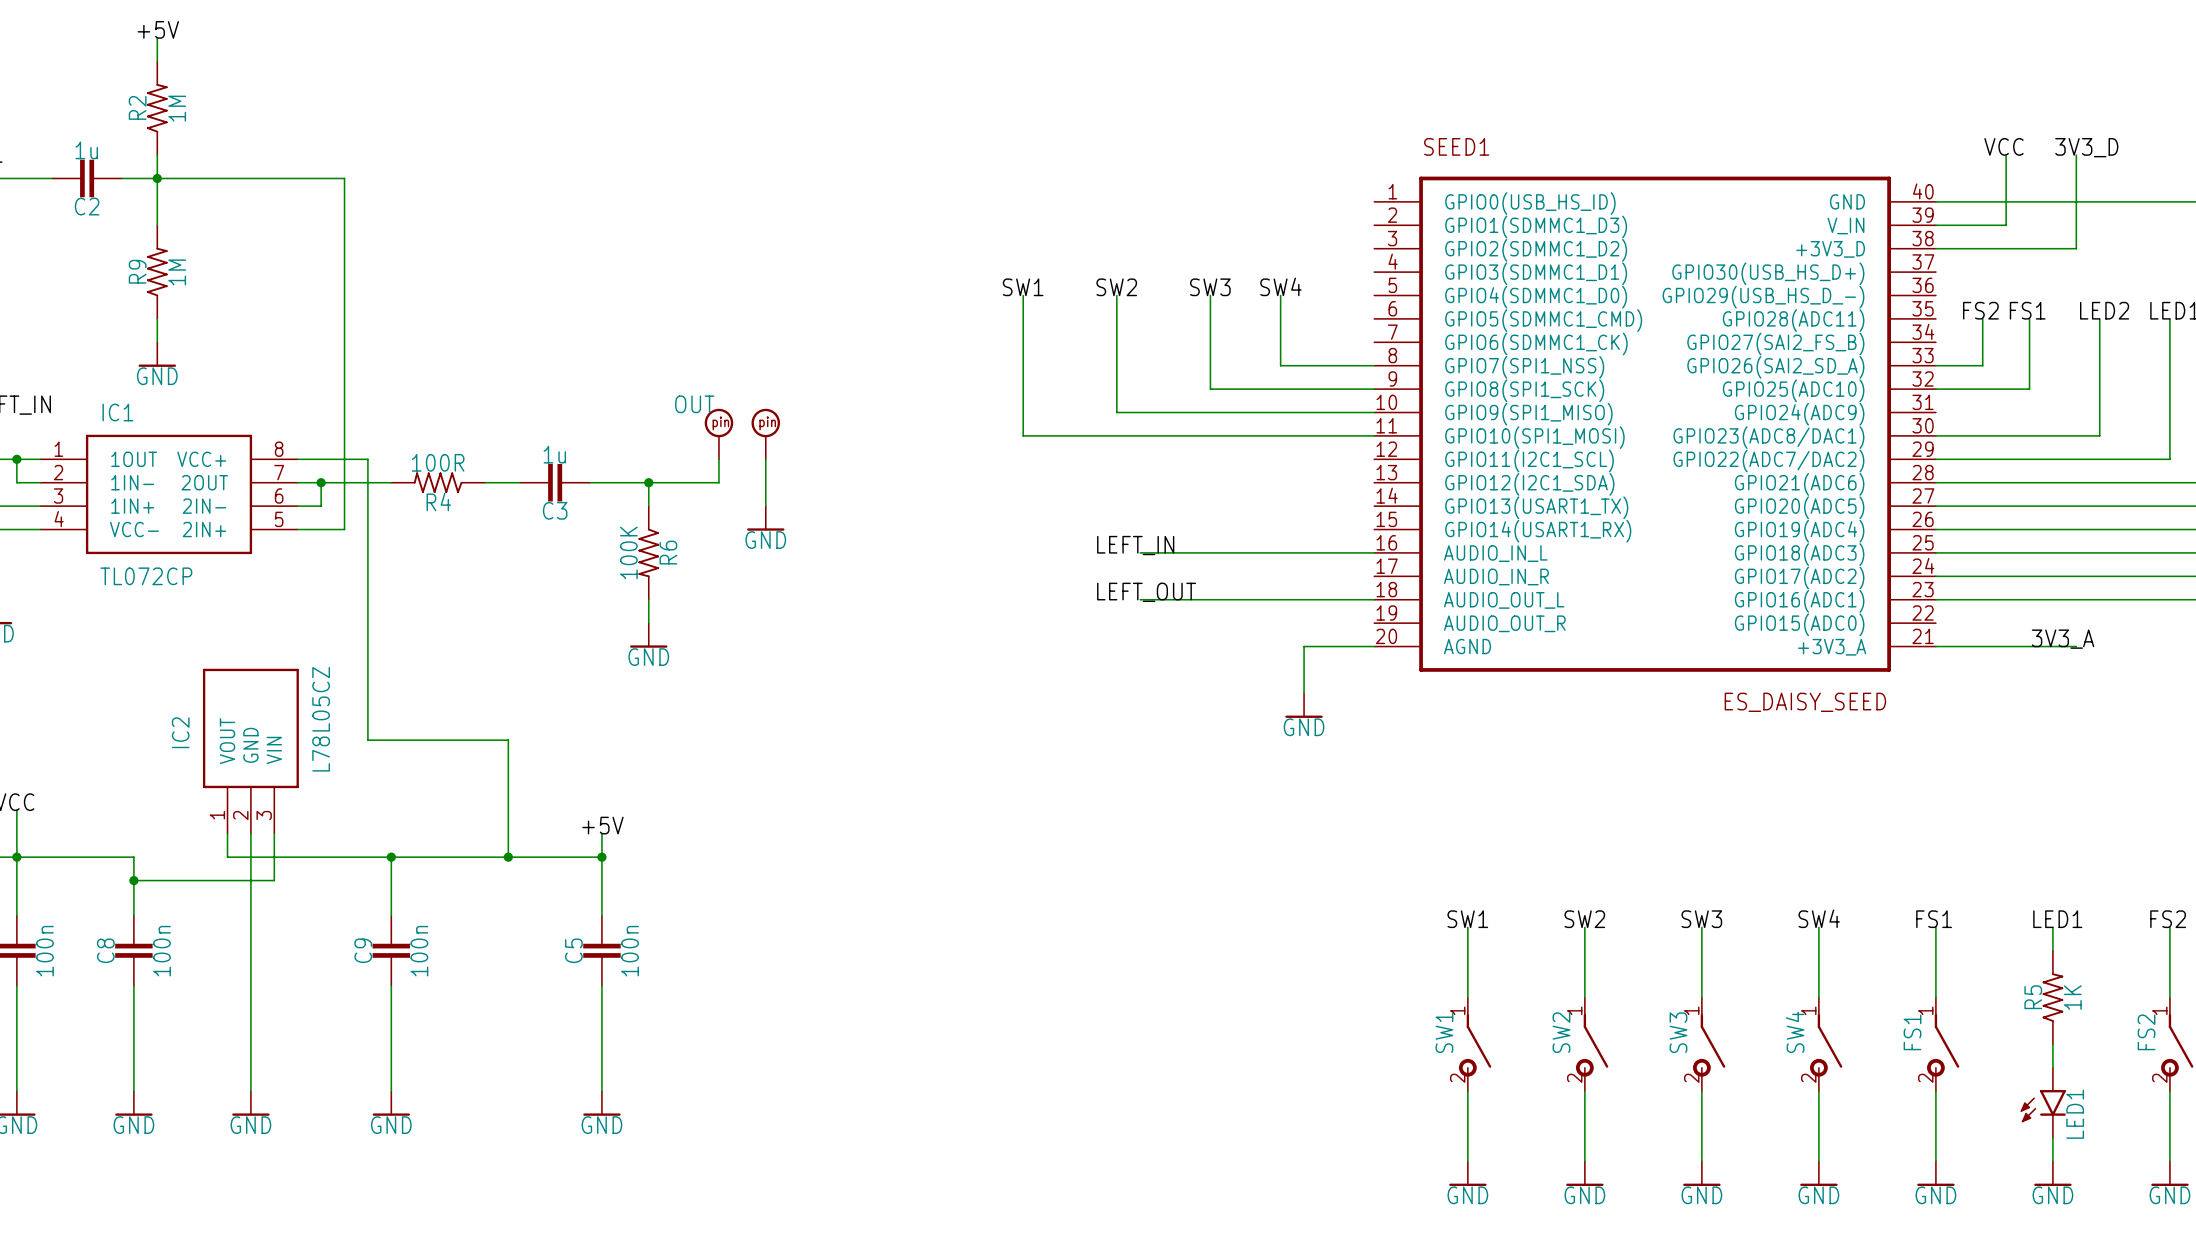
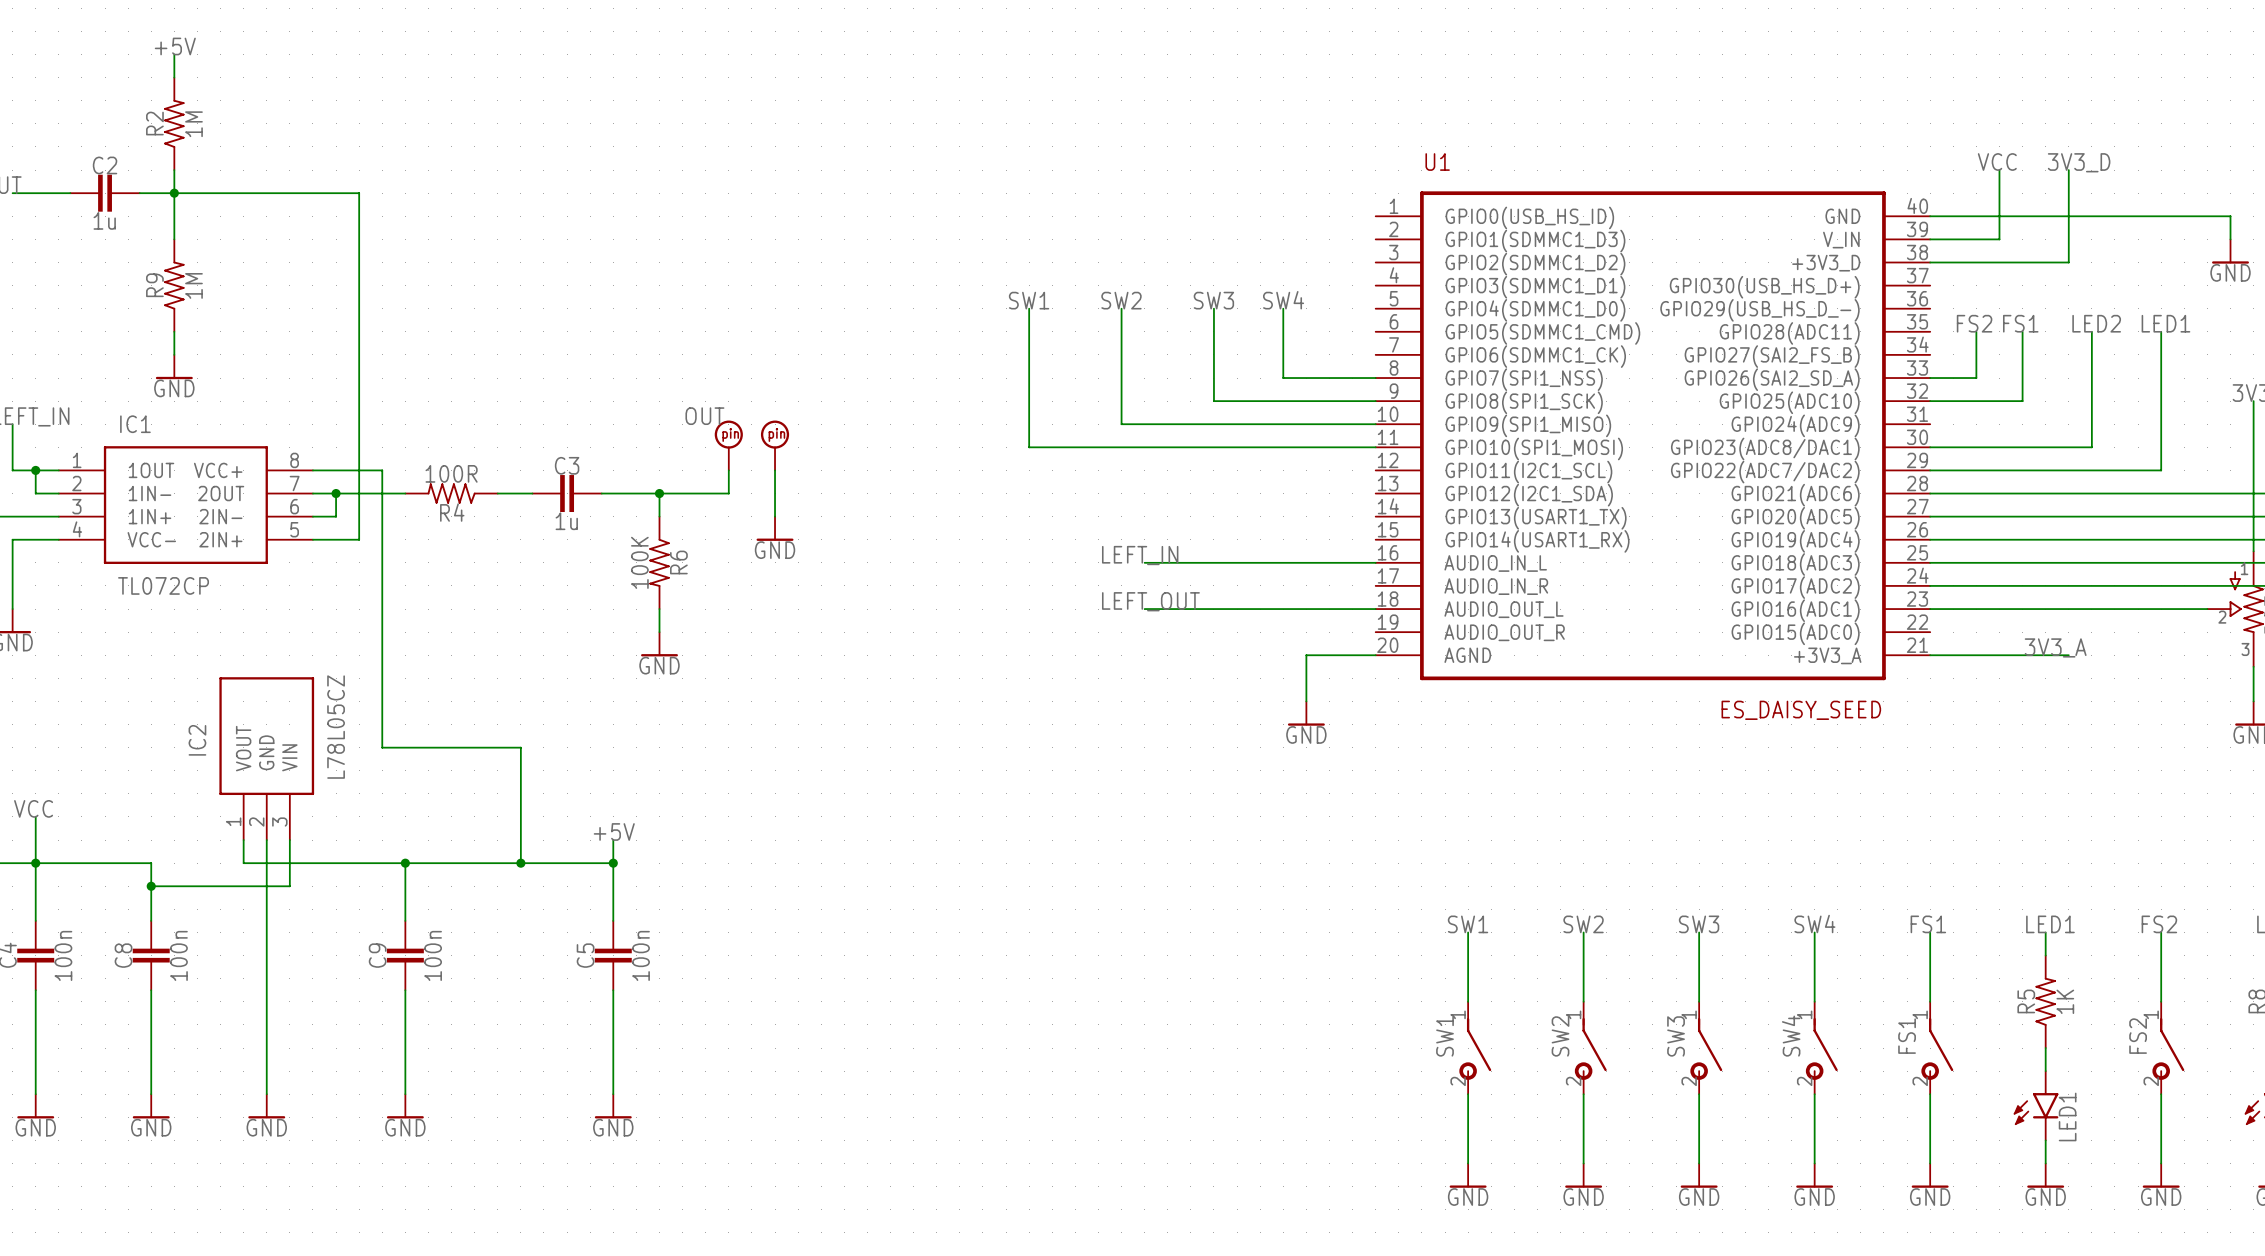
SEED1 name: SEED1 (1456, 146) -> U1 (1437, 162)
C2 value position: 1u (86, 150) -> 1u (104, 220)
C2 name position: C2 (87, 206) -> C2 (105, 165)
C3 value position: 1u (554, 454) -> 1u (566, 521)
C3 name position: C3 (555, 510) -> C3 (567, 465)

